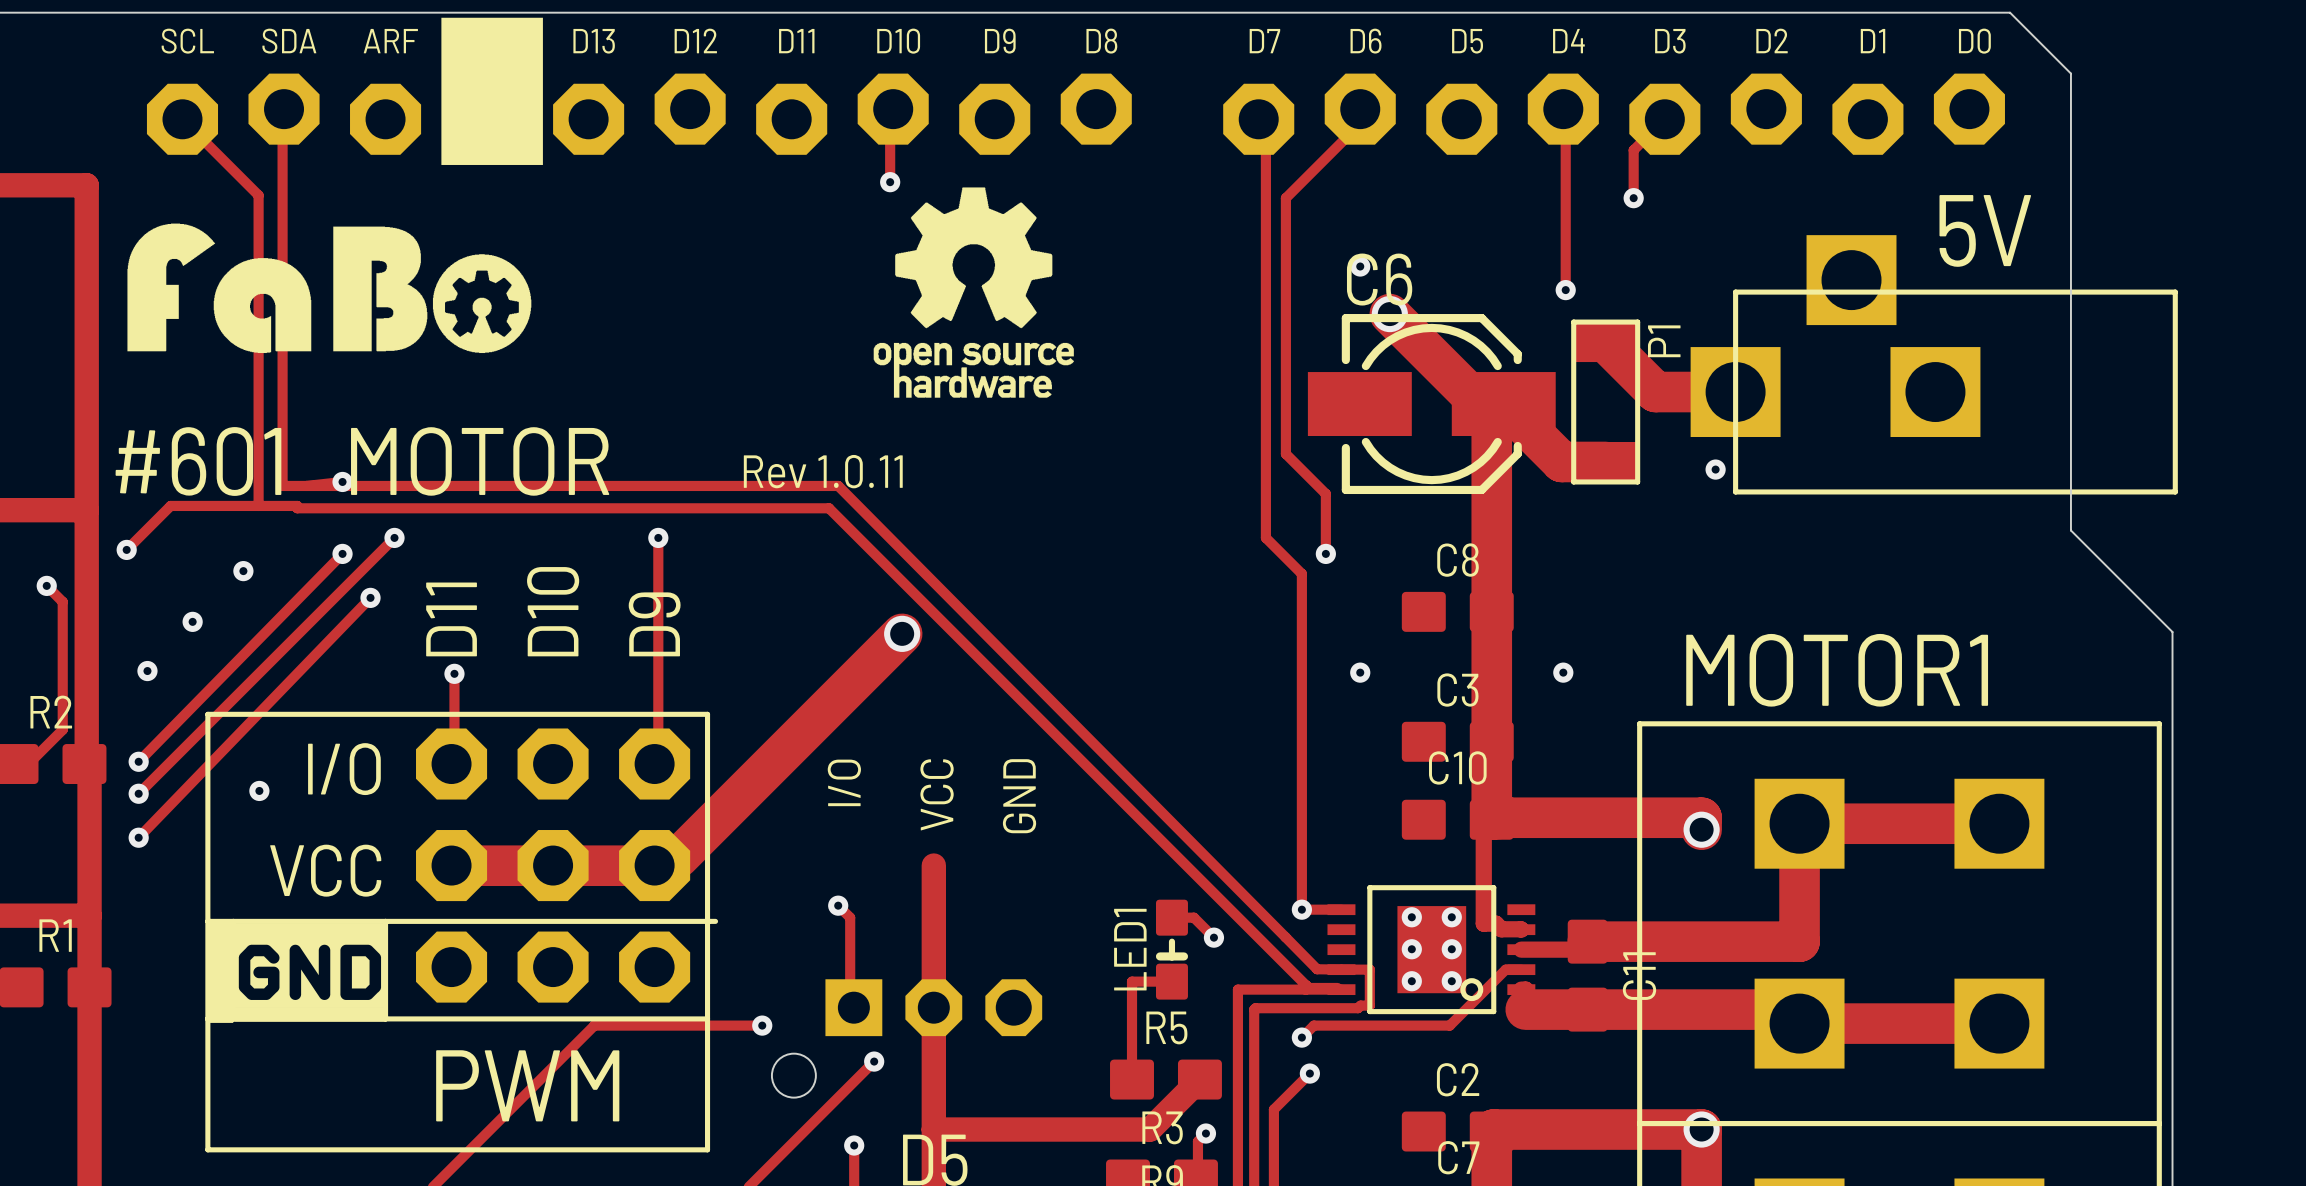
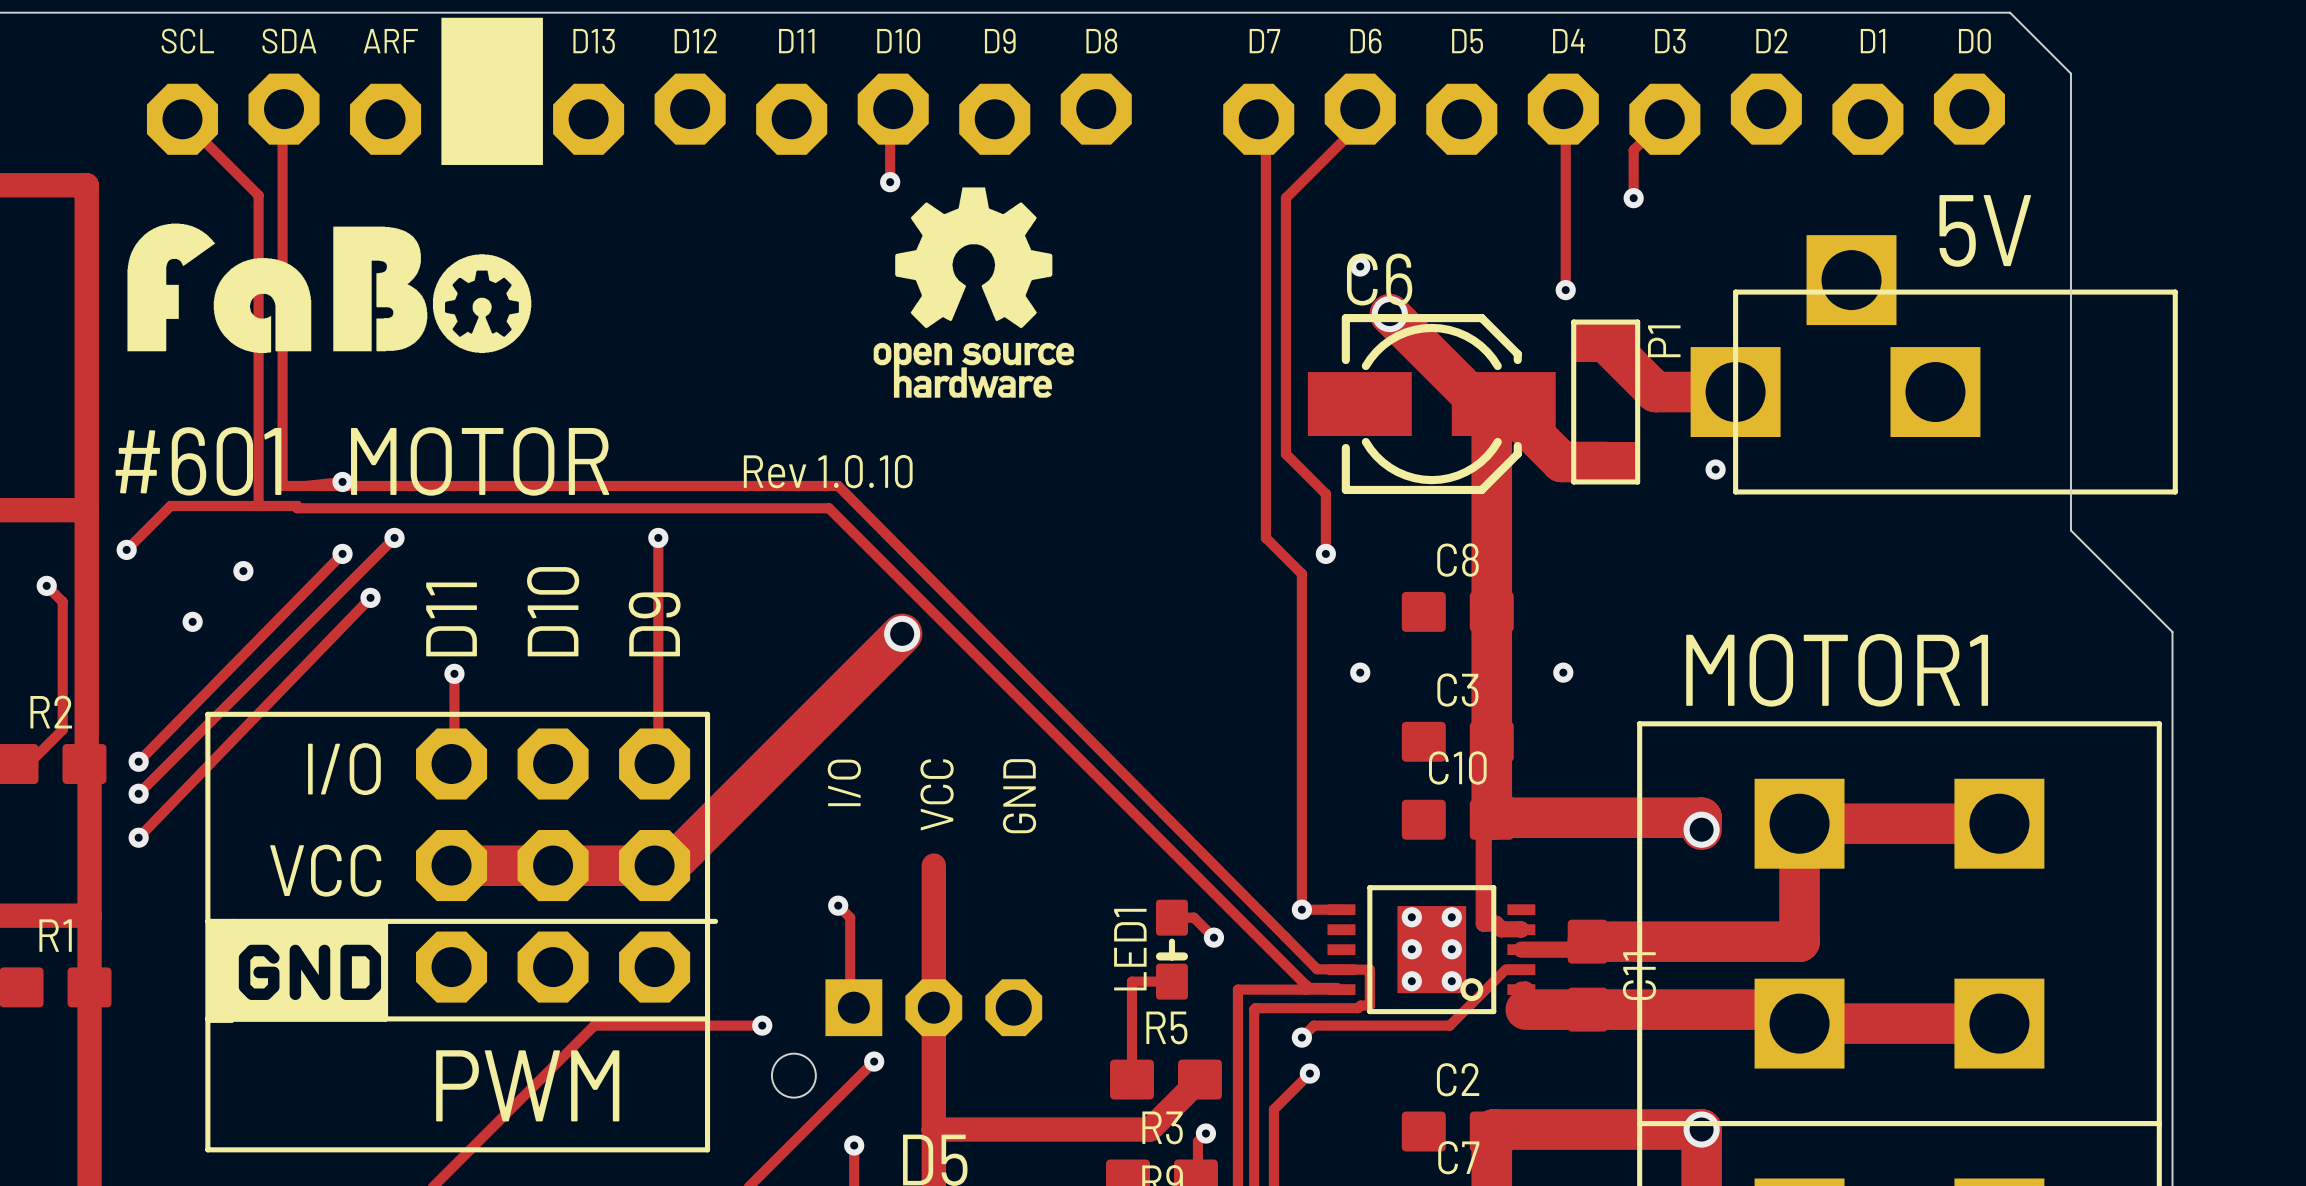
text: Rev 1.0.11 (823, 471) -> Rev 1.0.10 (828, 471)
via: (147, 671) -> none
via: (259, 790) -> none

